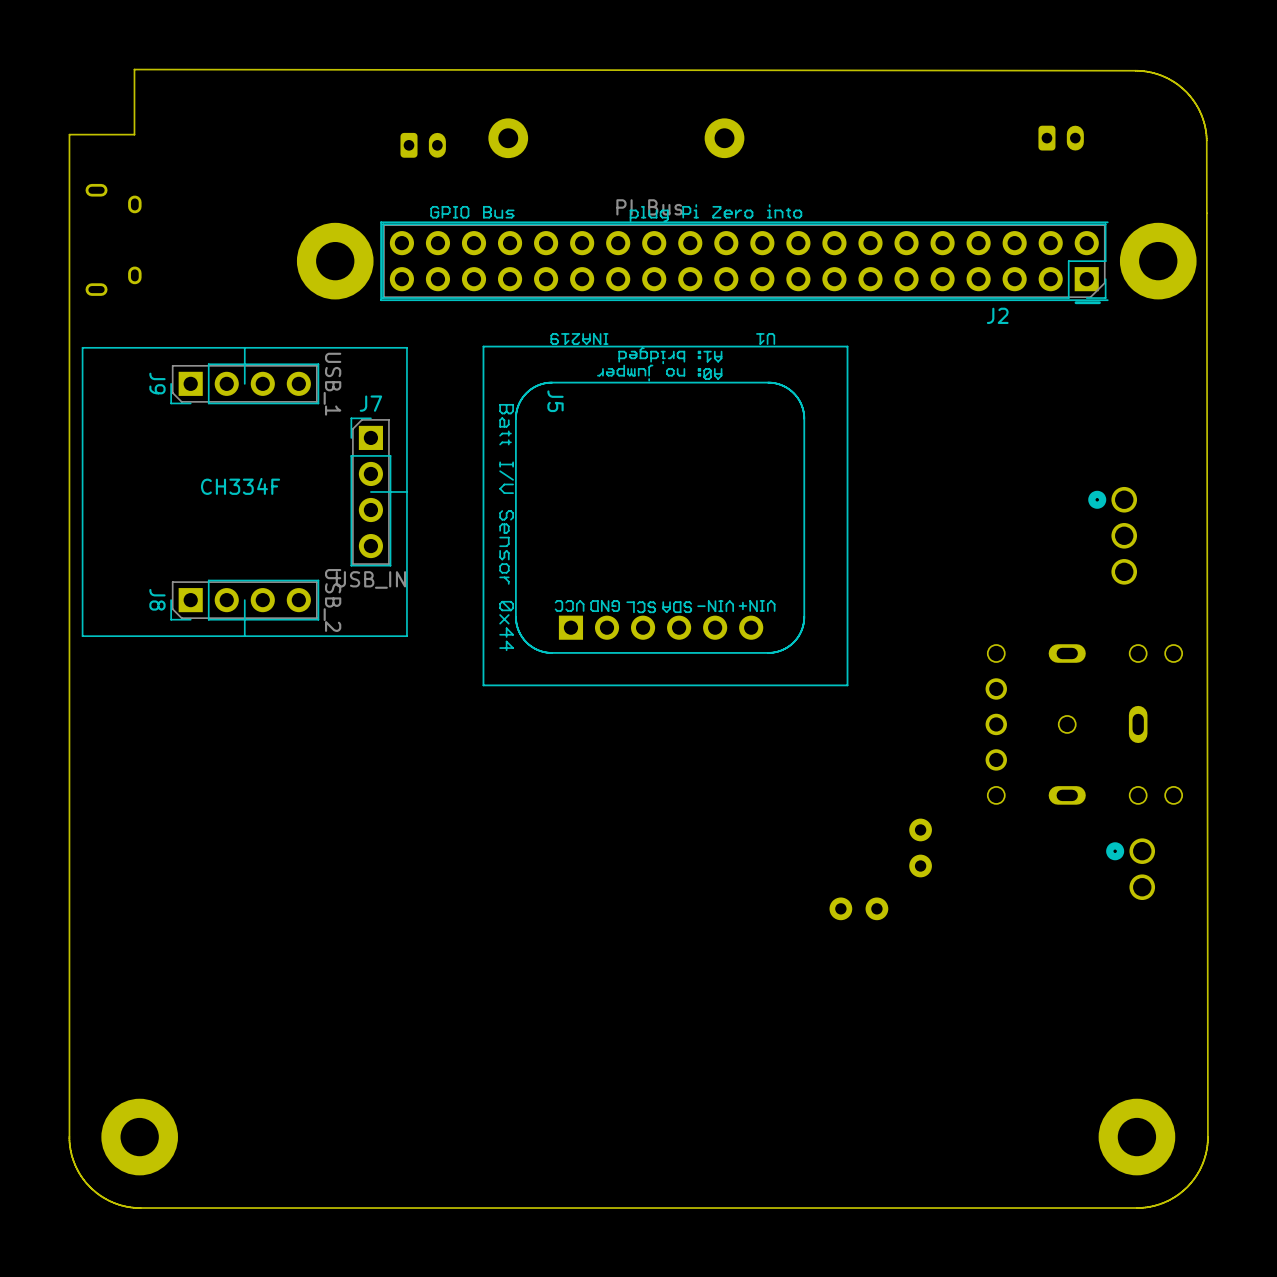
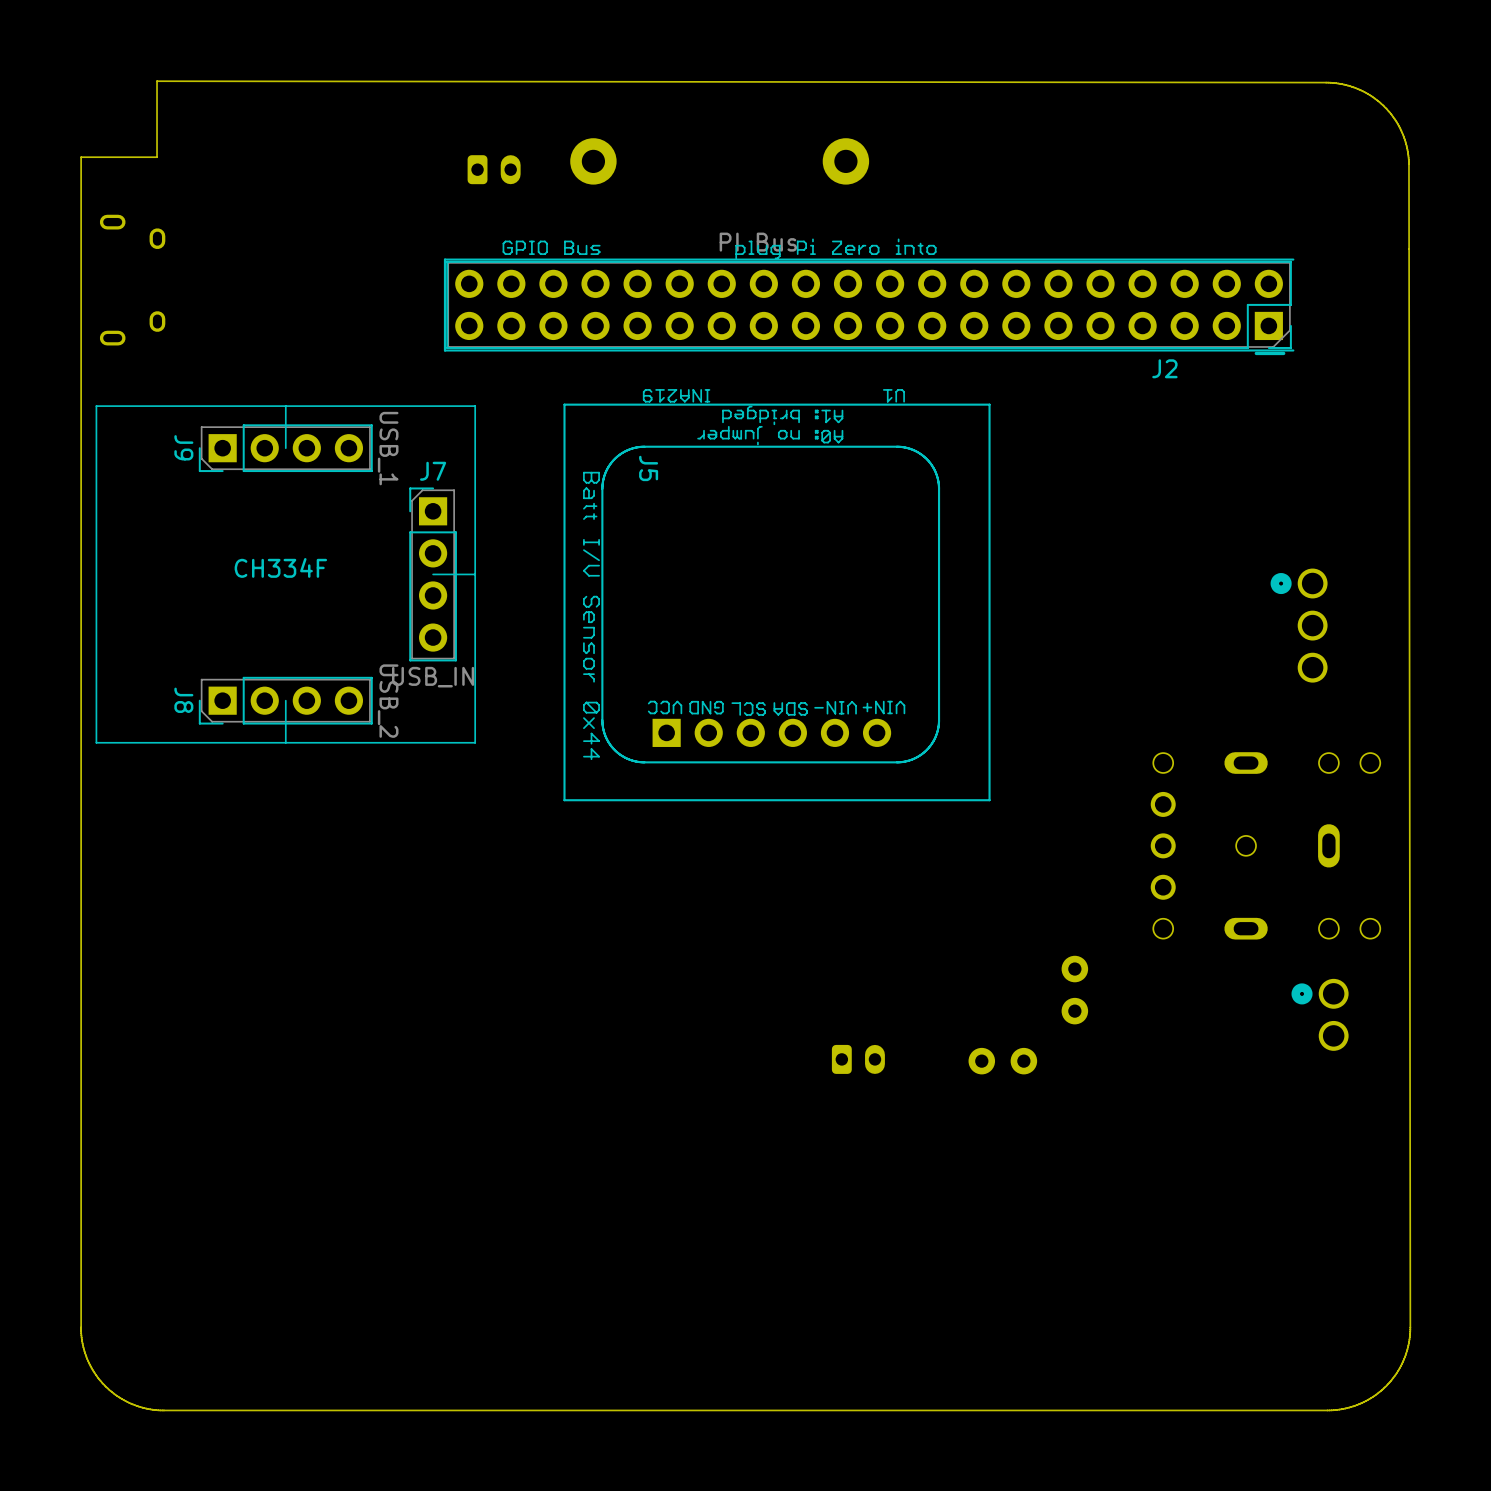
part: (1061, 138) -> none
part: (335, 261) -> none
part: (1158, 261) -> none
part: none -> (858, 1059)
part: (139, 1137) -> none
part: (1136, 1137) -> none

